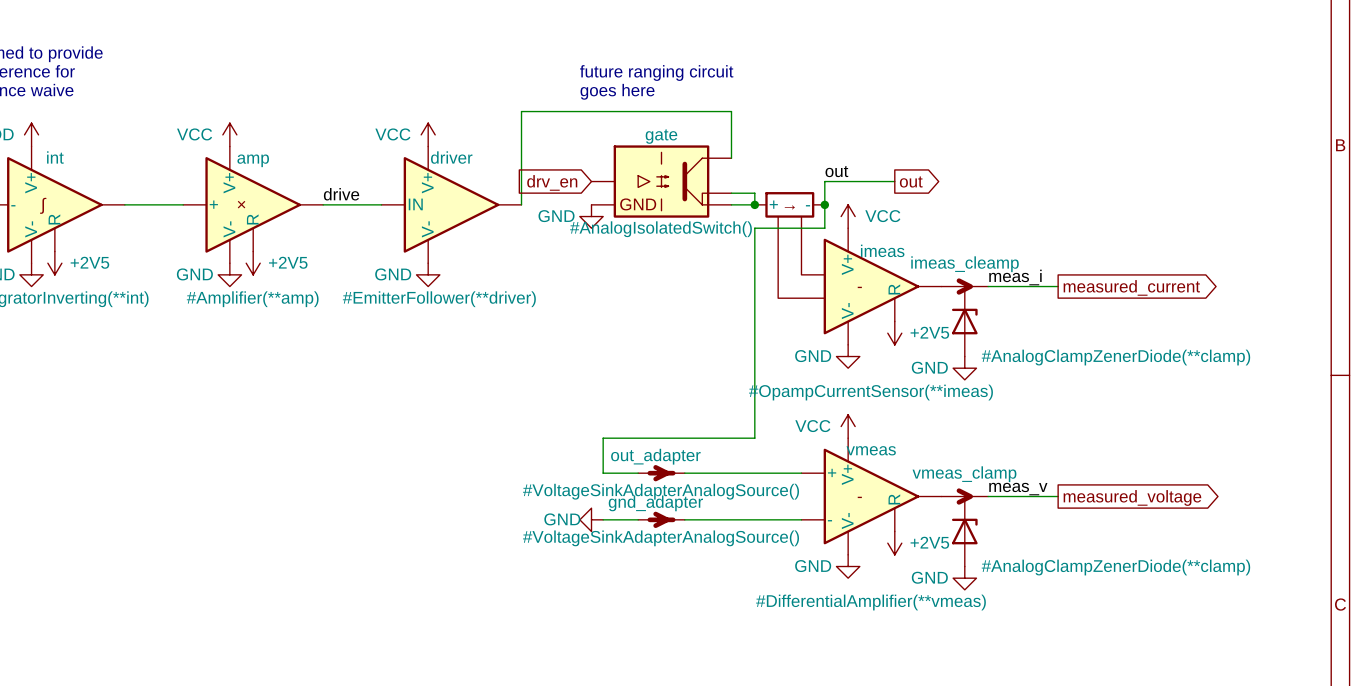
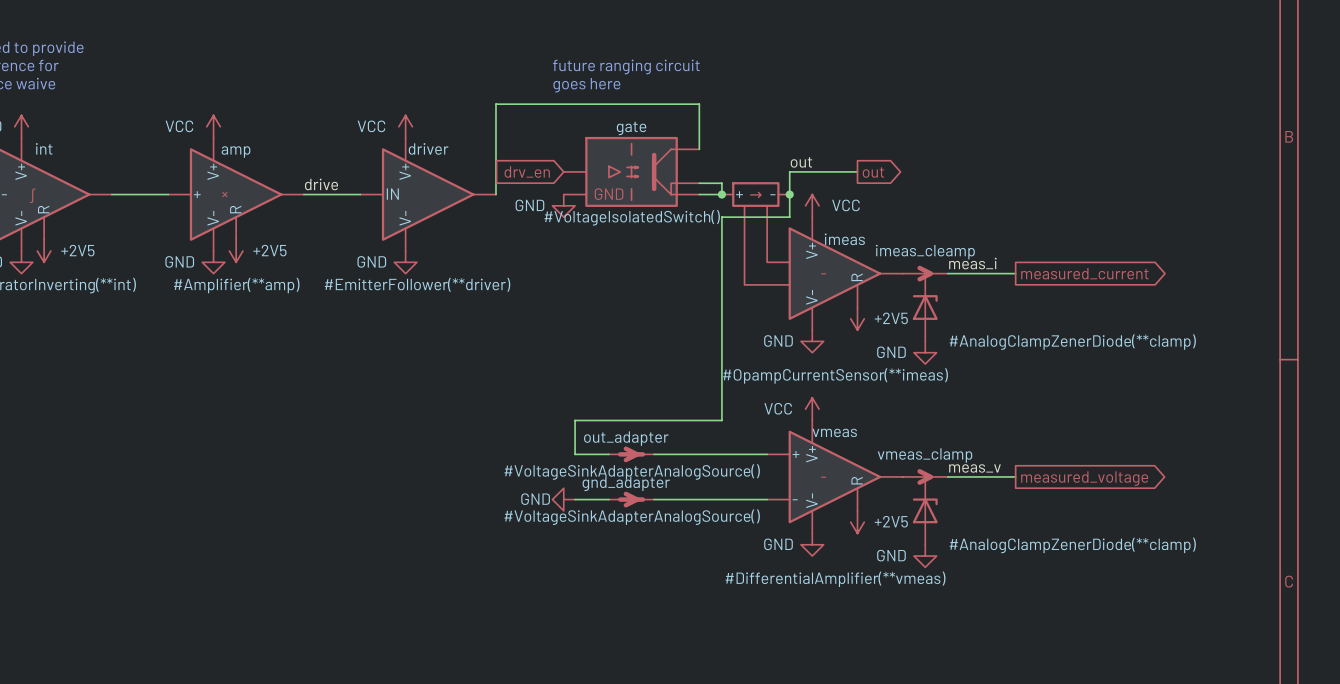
gate value: #AnalogIsolatedSwitch() (661, 229) -> #VoltageIsolatedSwitch() (632, 217)

